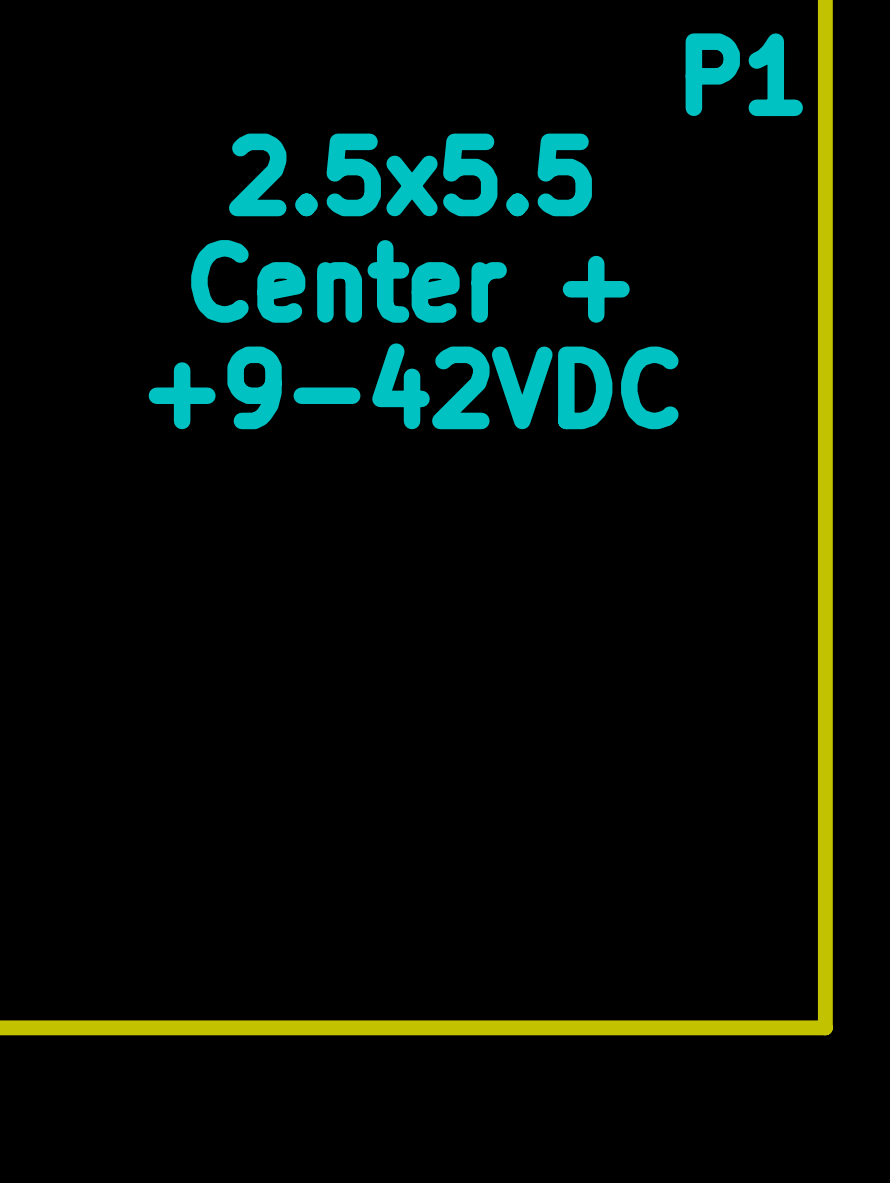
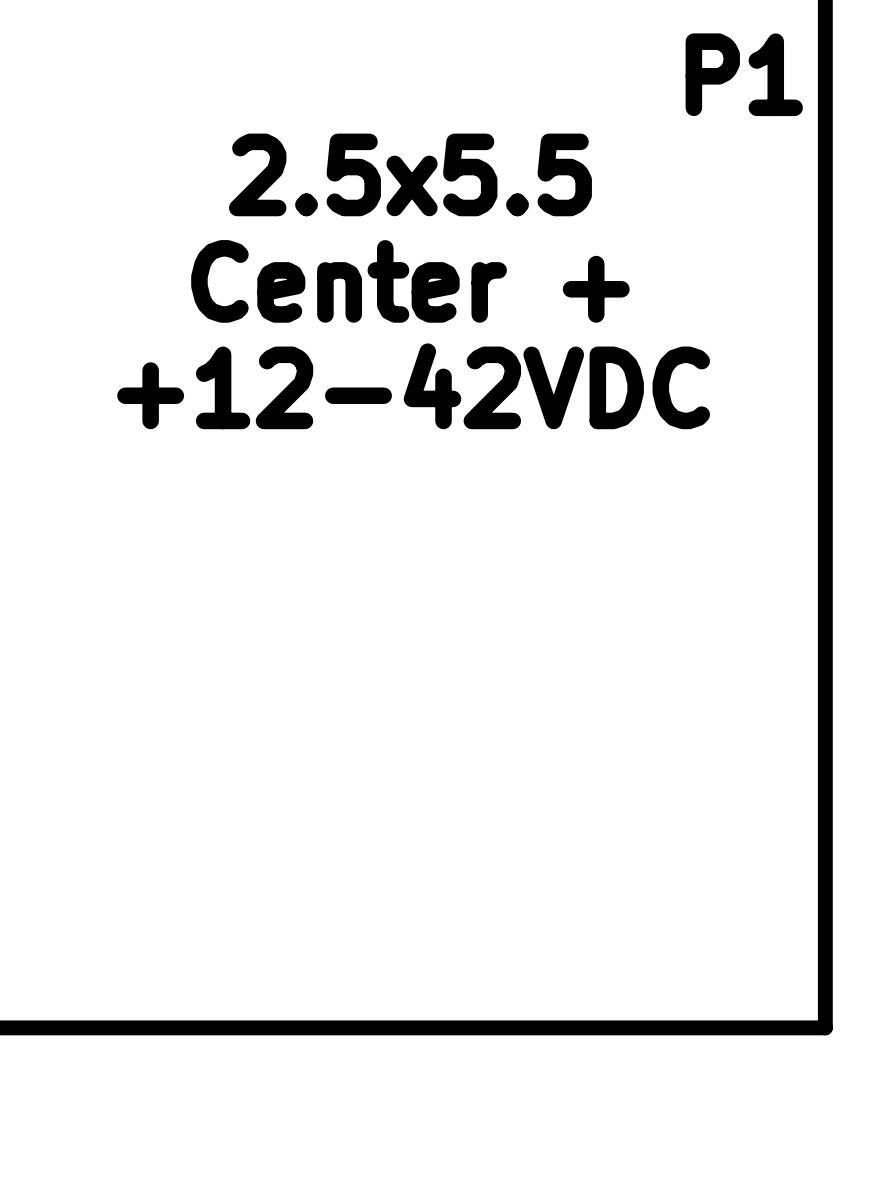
text: +9-42VDC (413, 386) -> +12-42VDC (413, 386)

